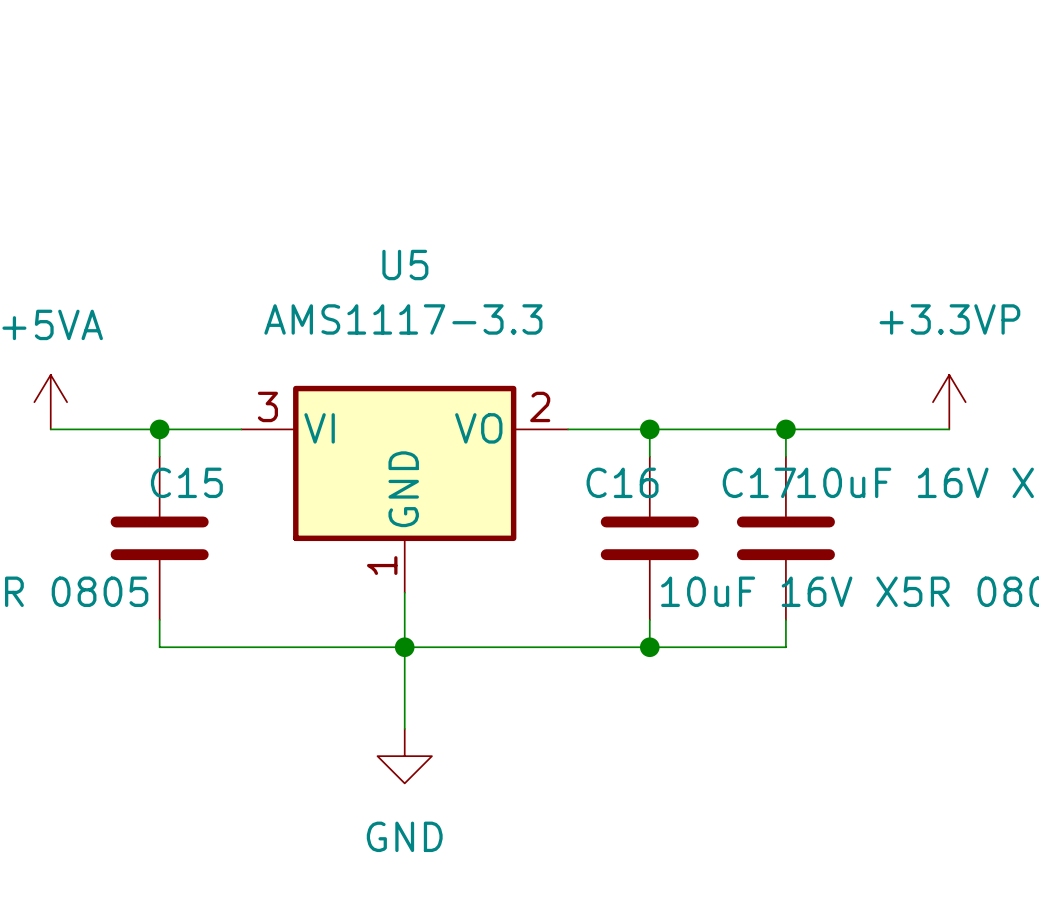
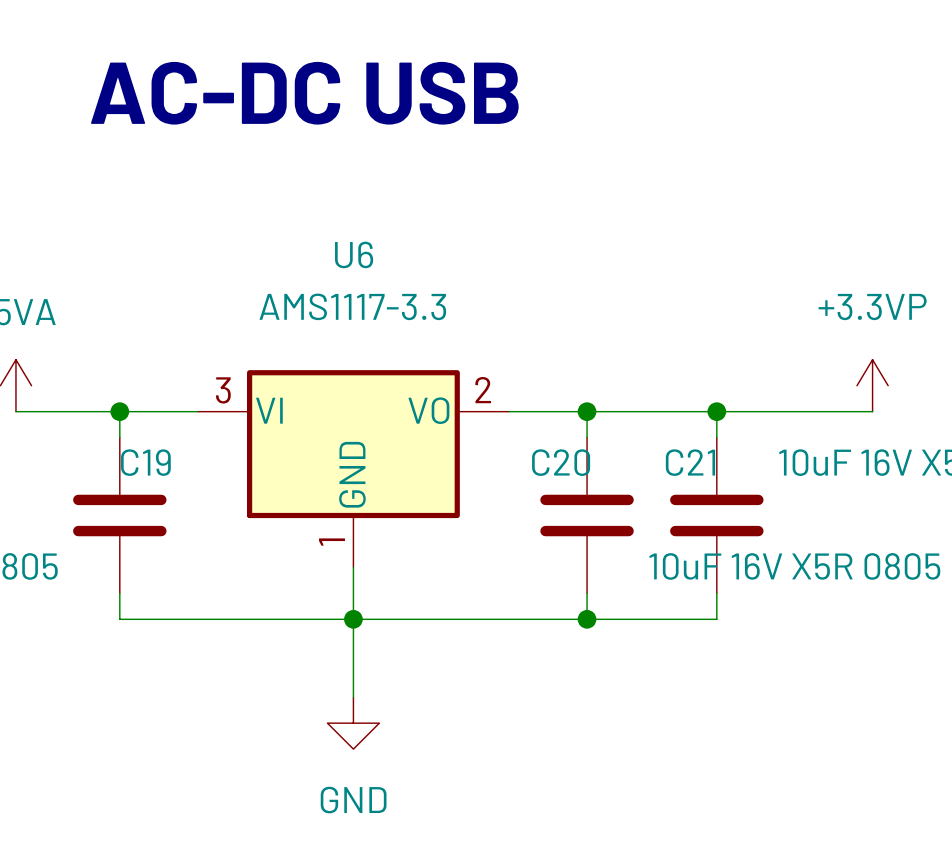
text: none -> AC-DC USB (304, 93)
U5 name: U5 (405, 265) -> U6 (354, 254)
C15 name: C15 (186, 482) -> C19 (145, 462)
C16 name: C16 (622, 482) -> C20 (561, 462)
C17 name: C17 (759, 482) -> C21 (690, 462)

